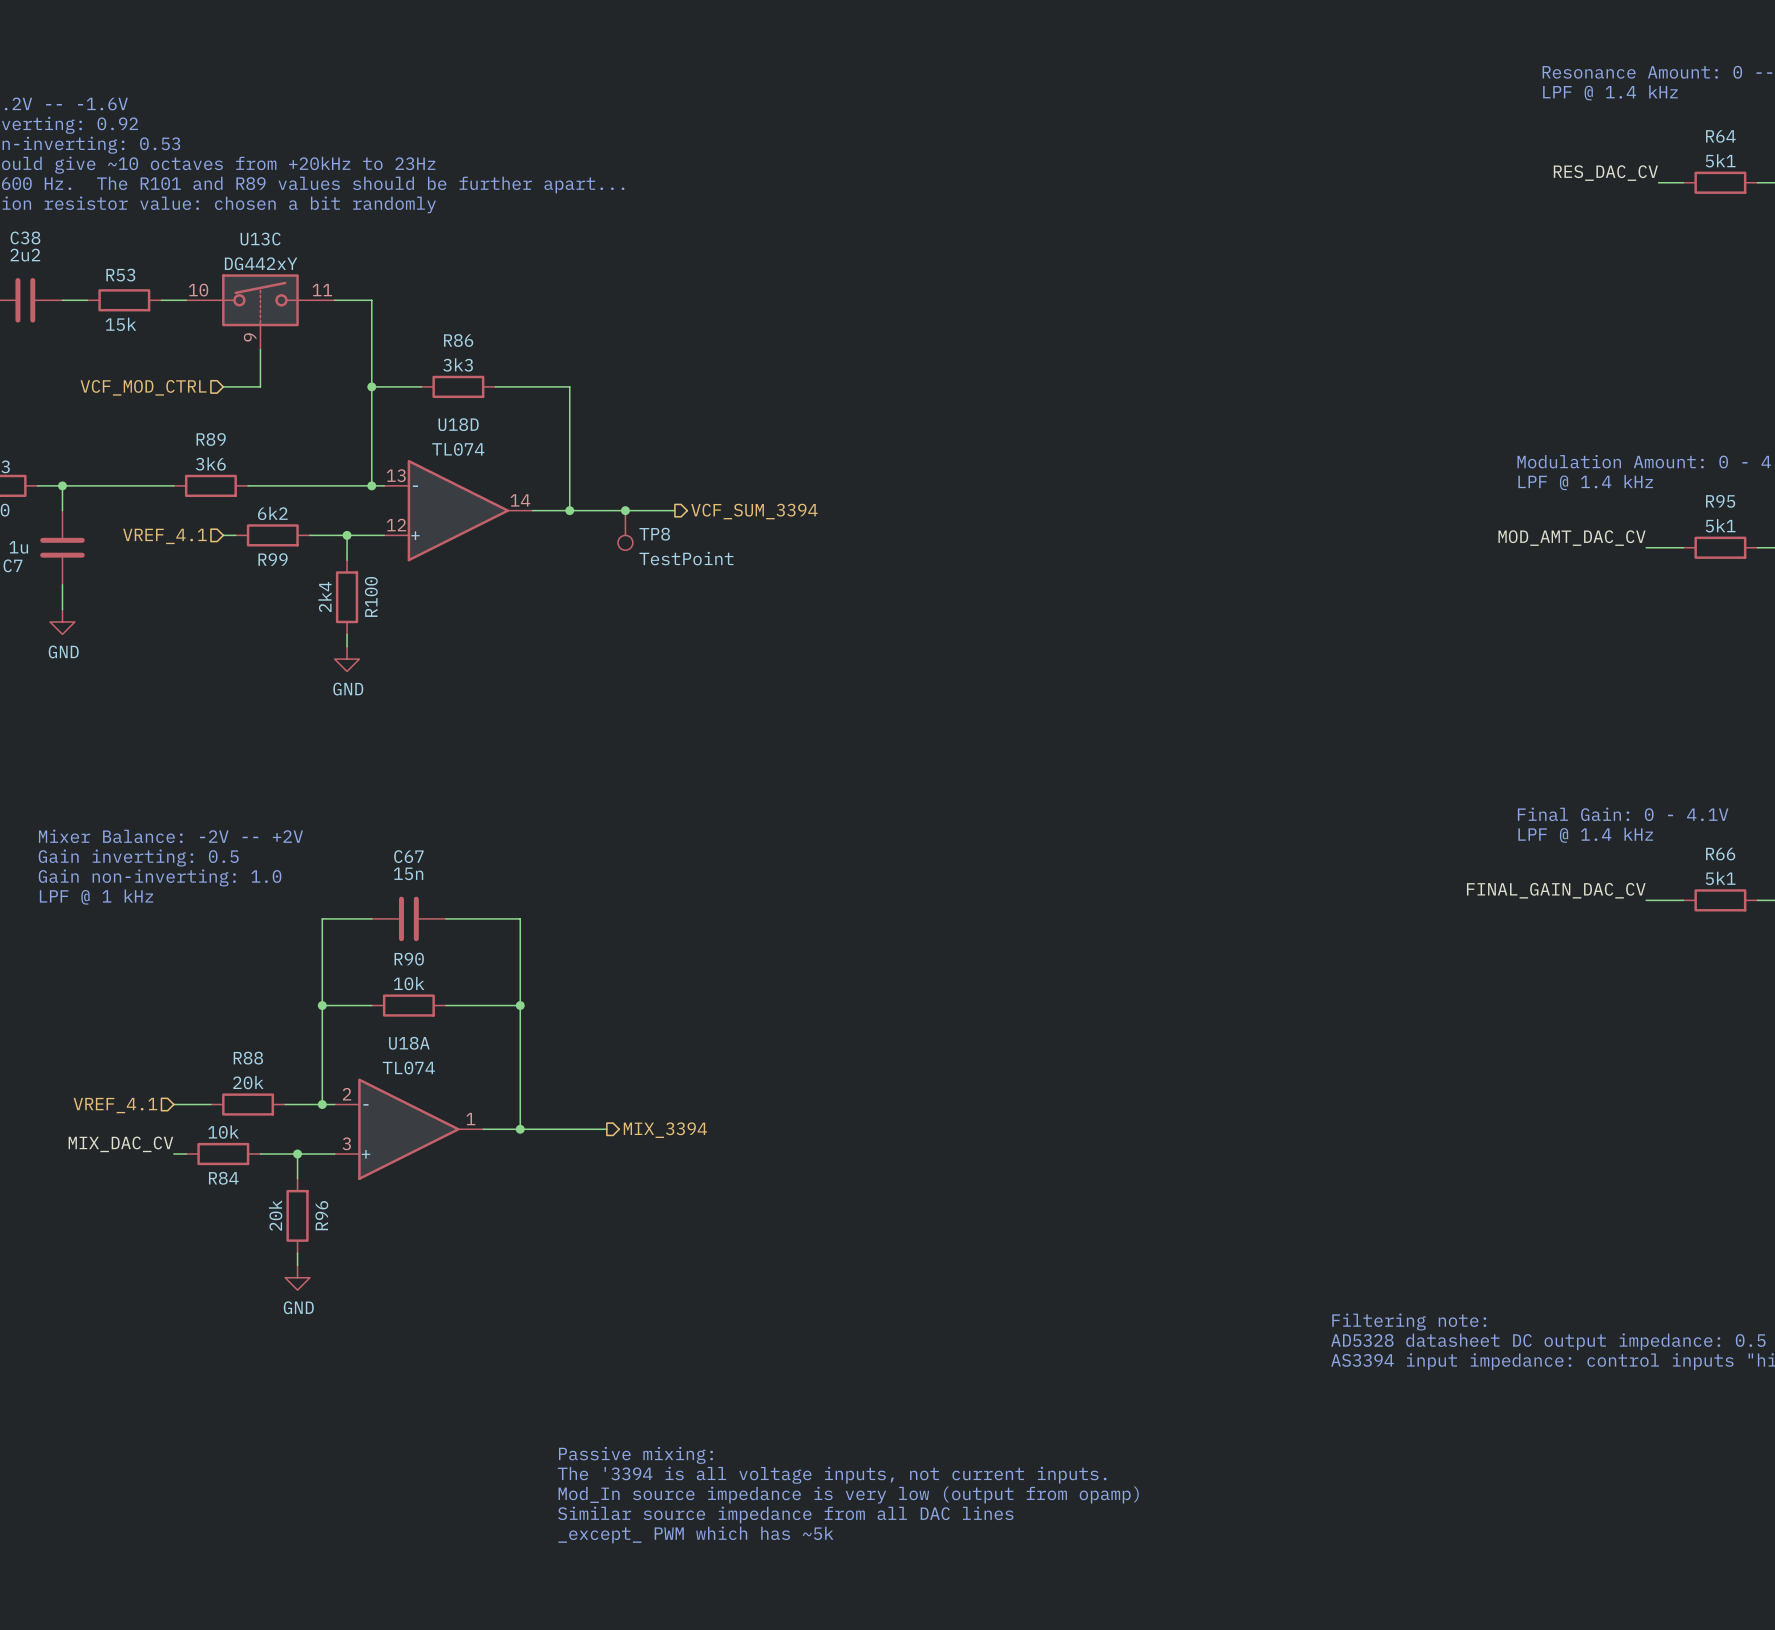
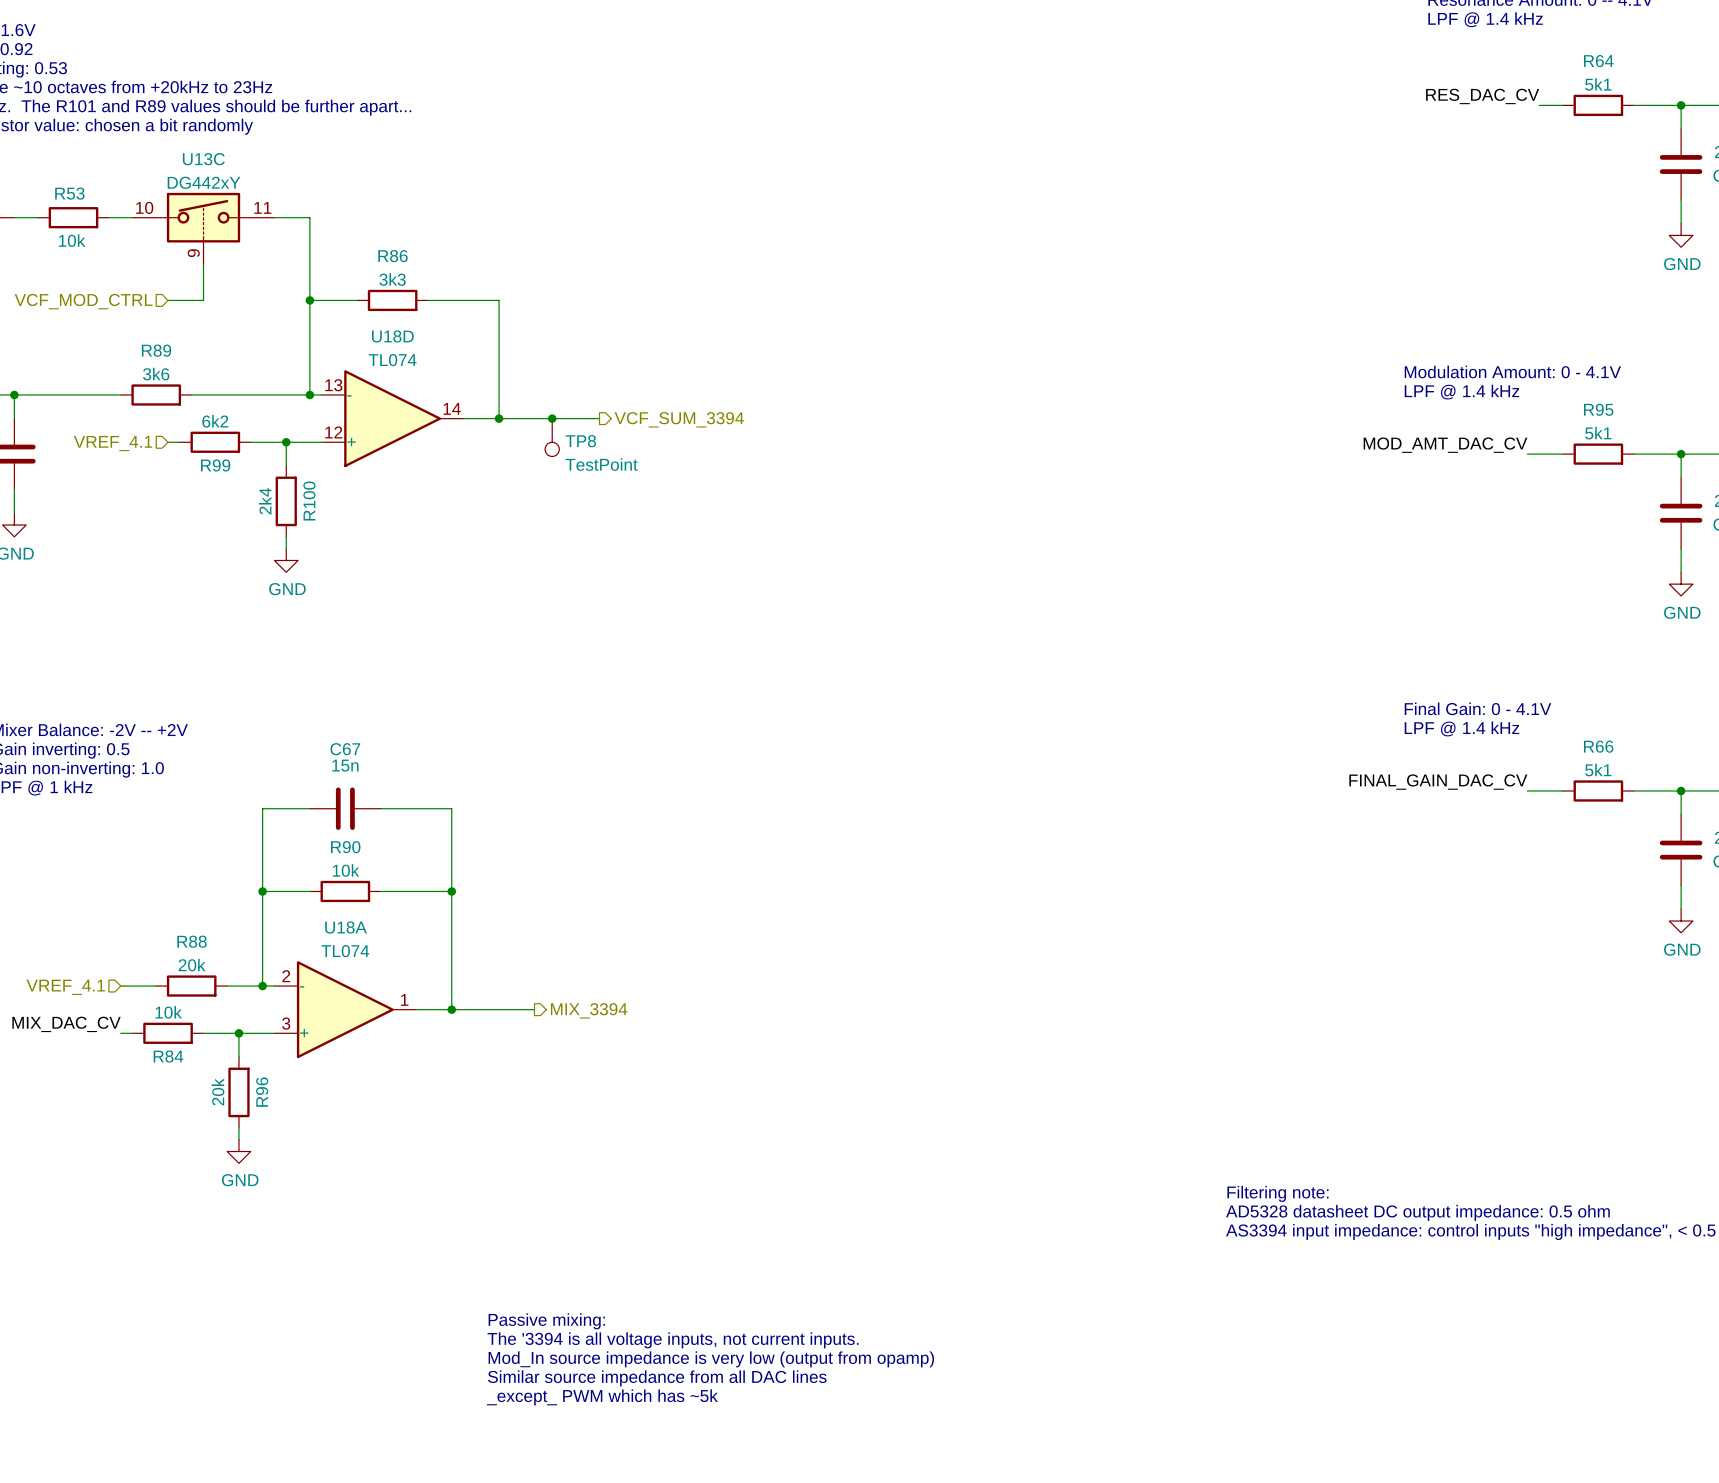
R53 value: 15k (120, 324) -> 10k (72, 240)

